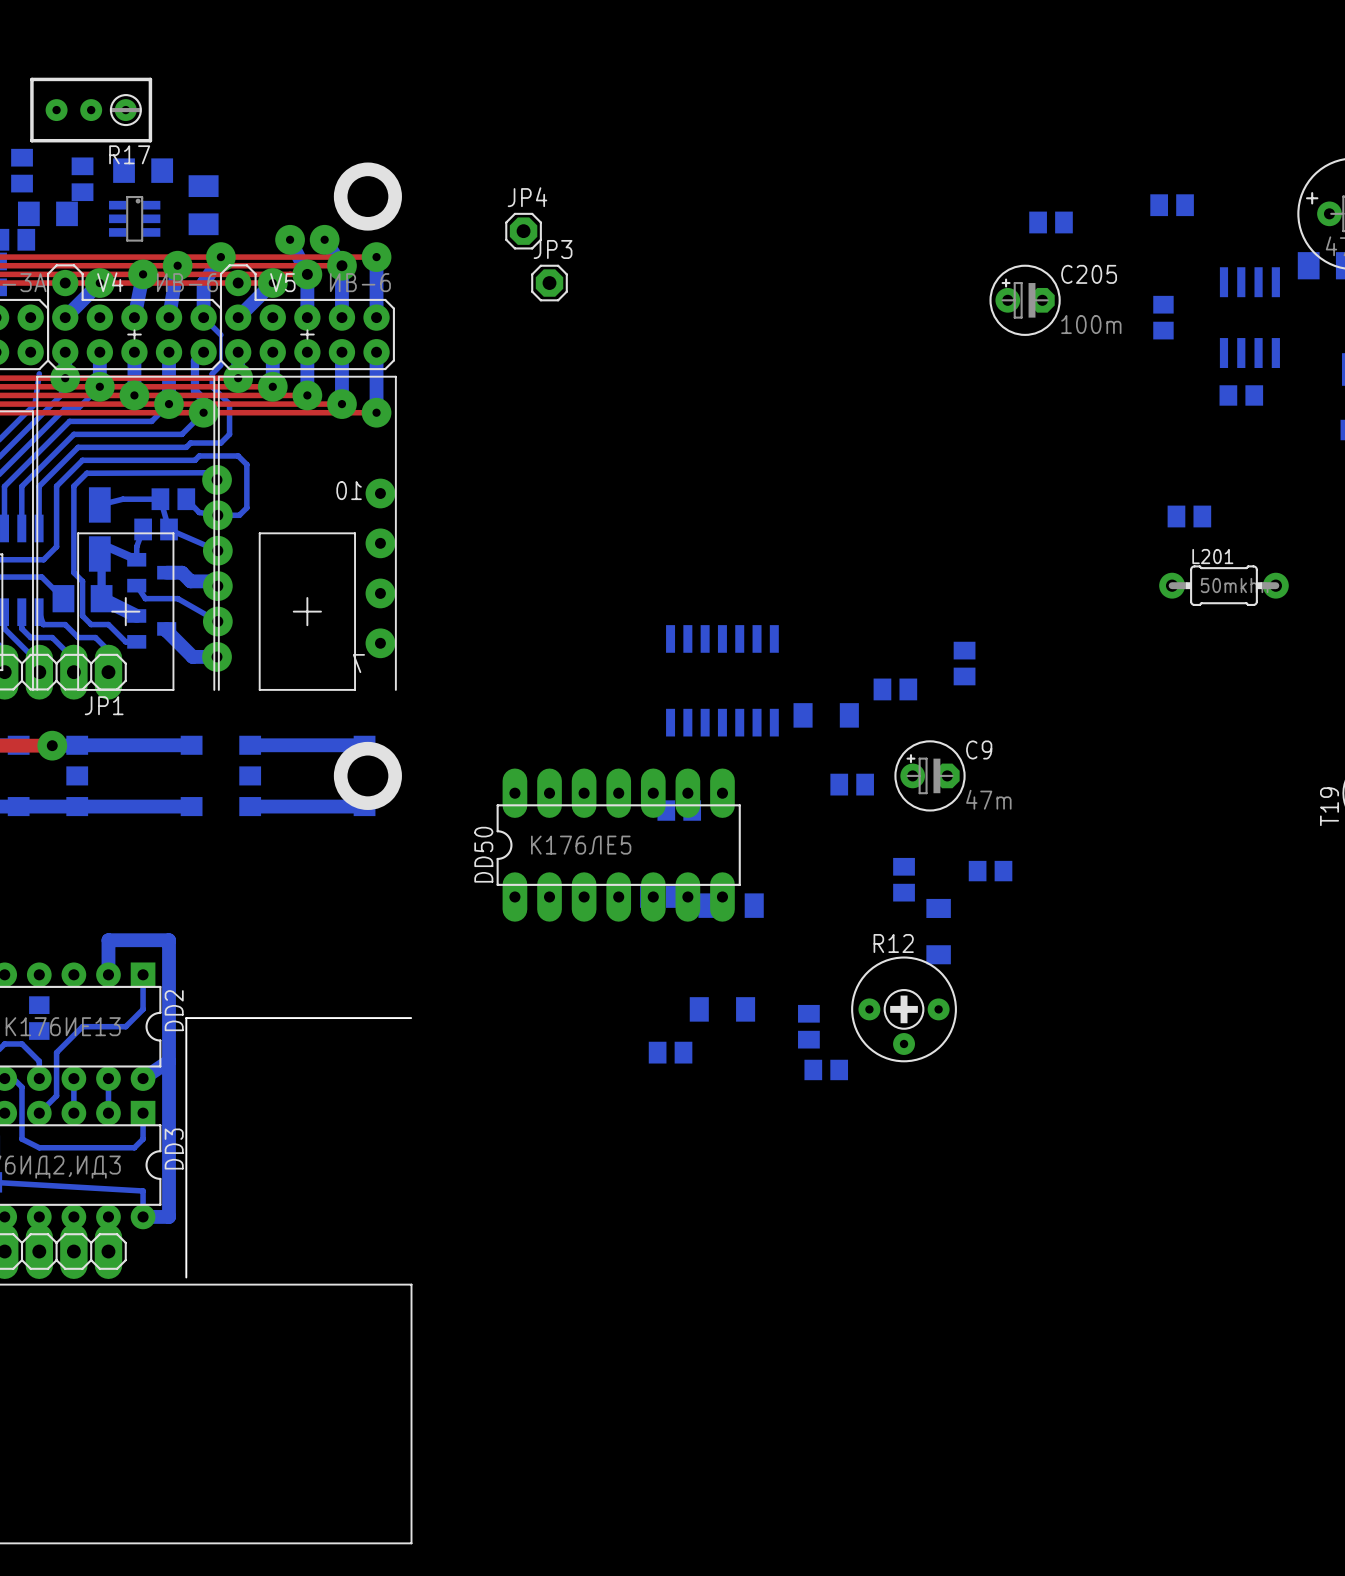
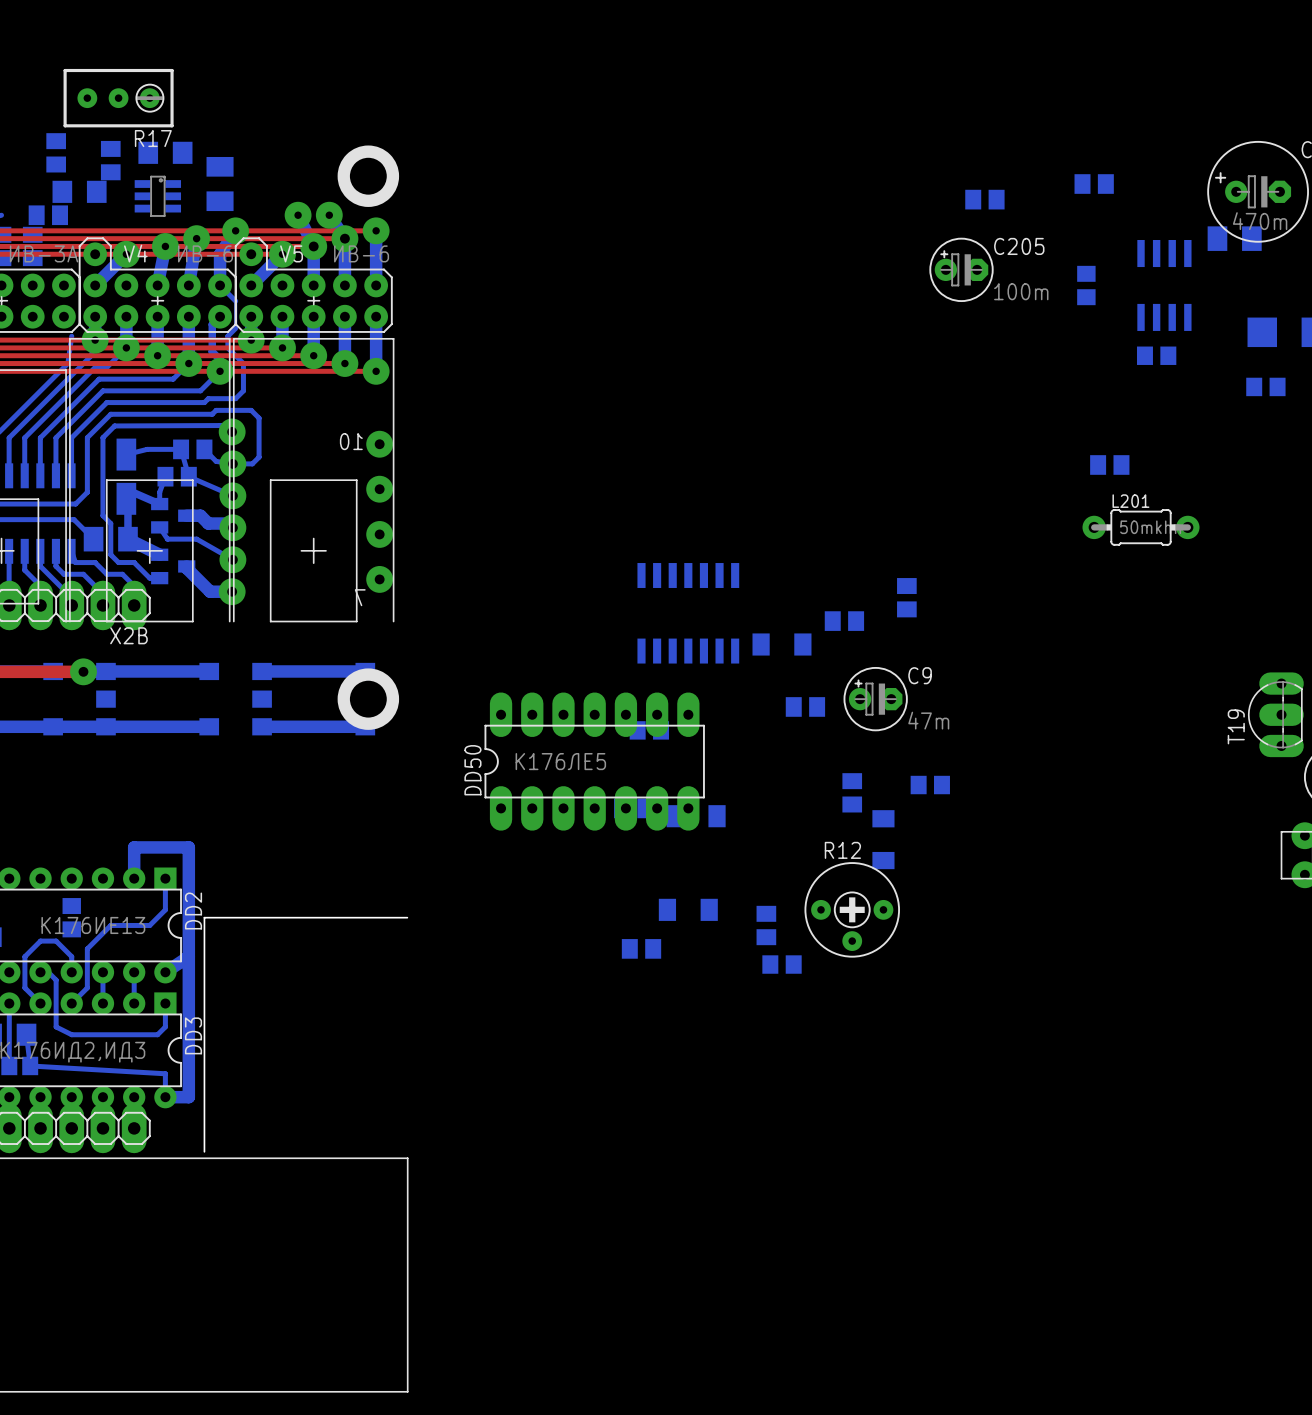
JP4: (523, 231) -> none
JP3: (549, 283) -> none
JP1 name: JP1 (104, 705) -> X2B (128, 635)

